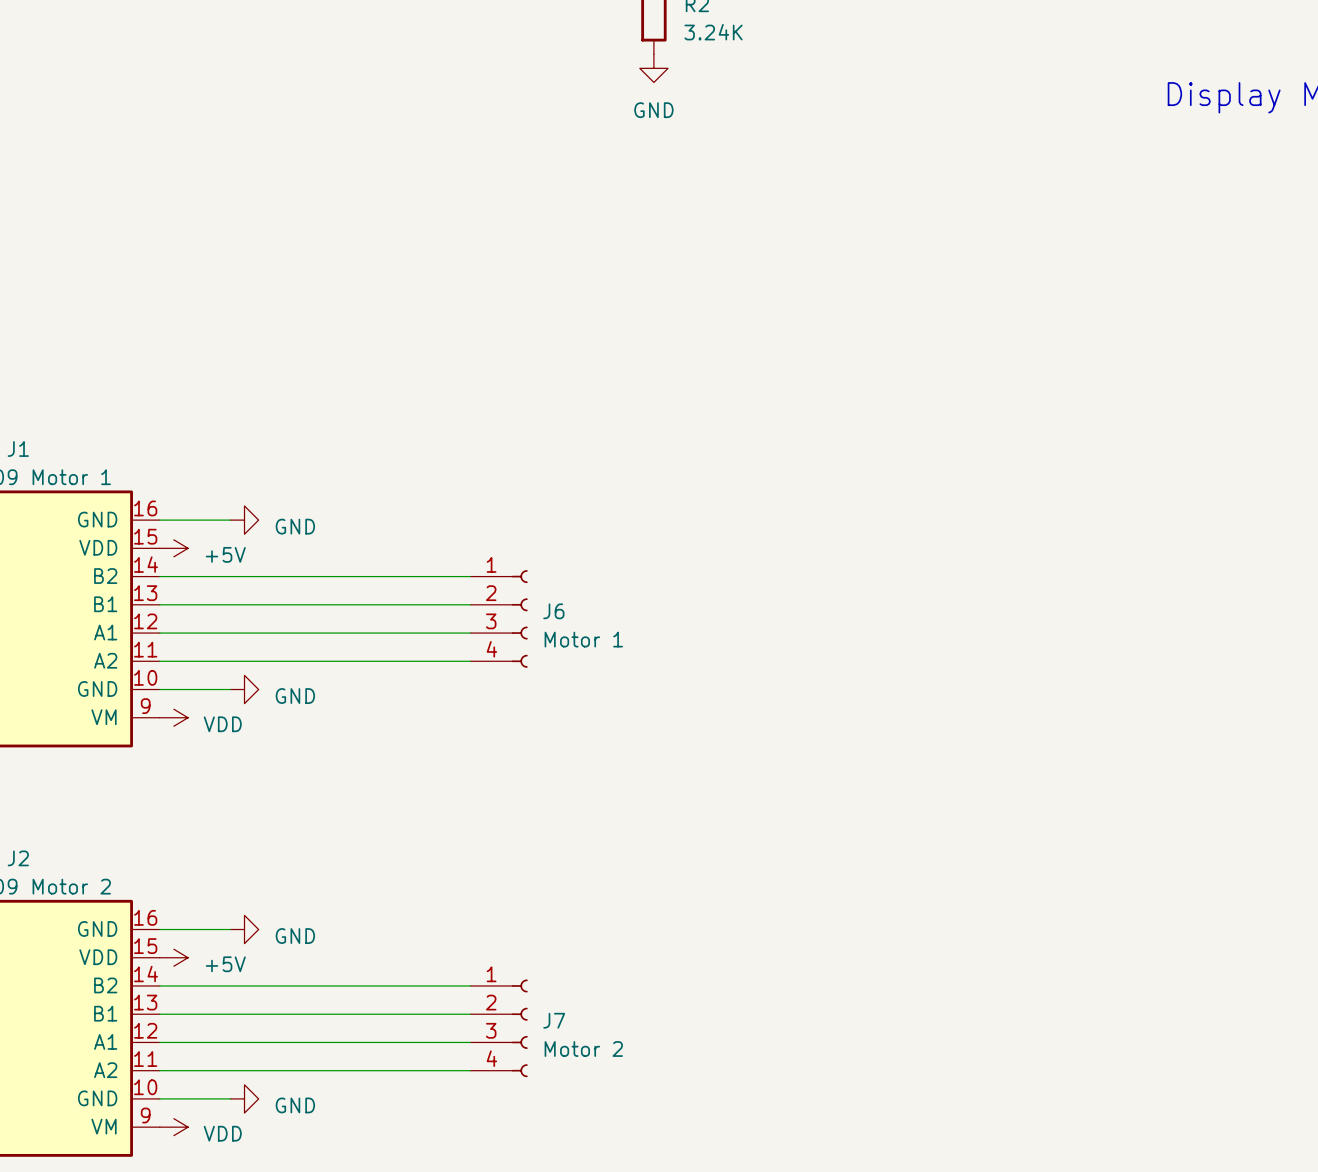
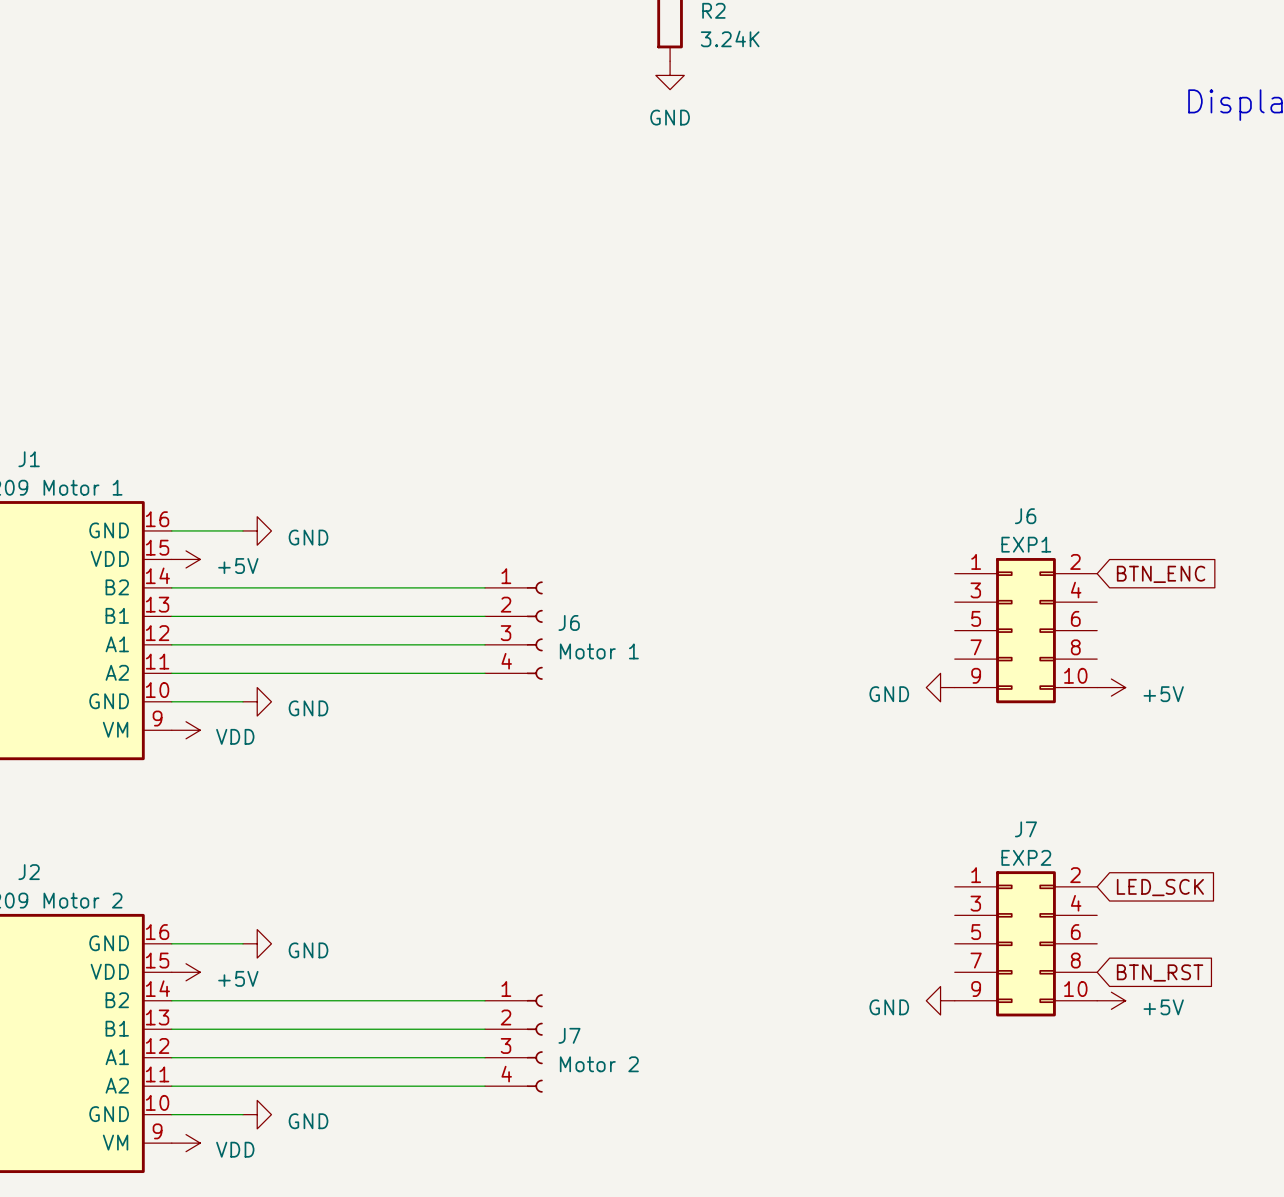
global label: none -> BTN_ENC (1161, 574)
J6: none -> EXP1 (1025, 630)
power symbol: none -> GND (940, 687)
power symbol: none -> +5V (1111, 687)
global label: none -> LED_SCK (1160, 887)
J7: none -> EXP2 (1025, 943)
global label: none -> BTN_RST (1160, 972)
power symbol: none -> GND (940, 1000)
power symbol: none -> +5V (1111, 1000)

